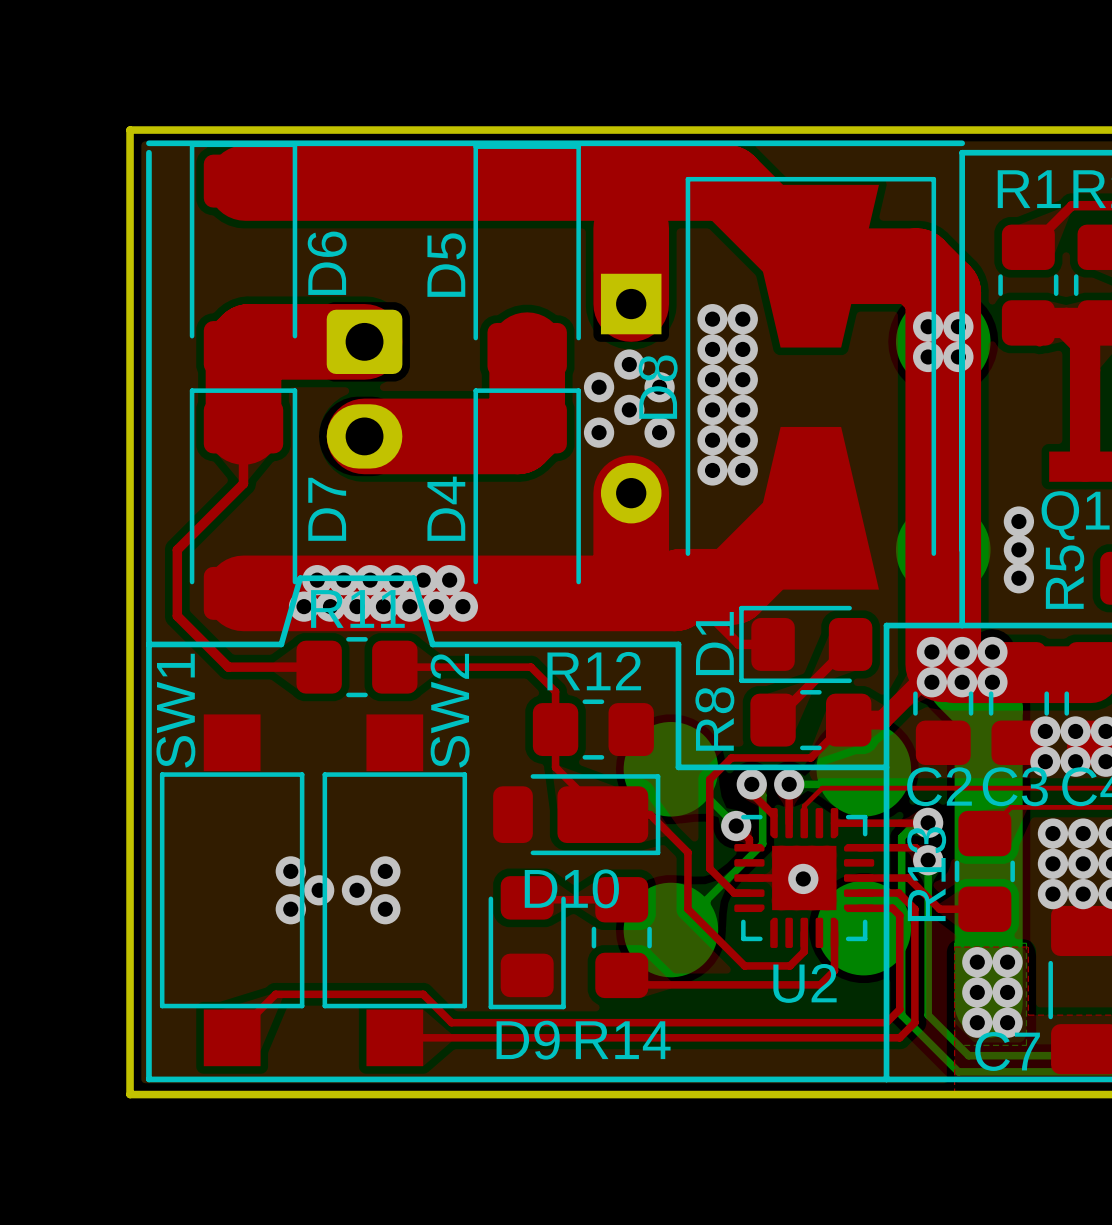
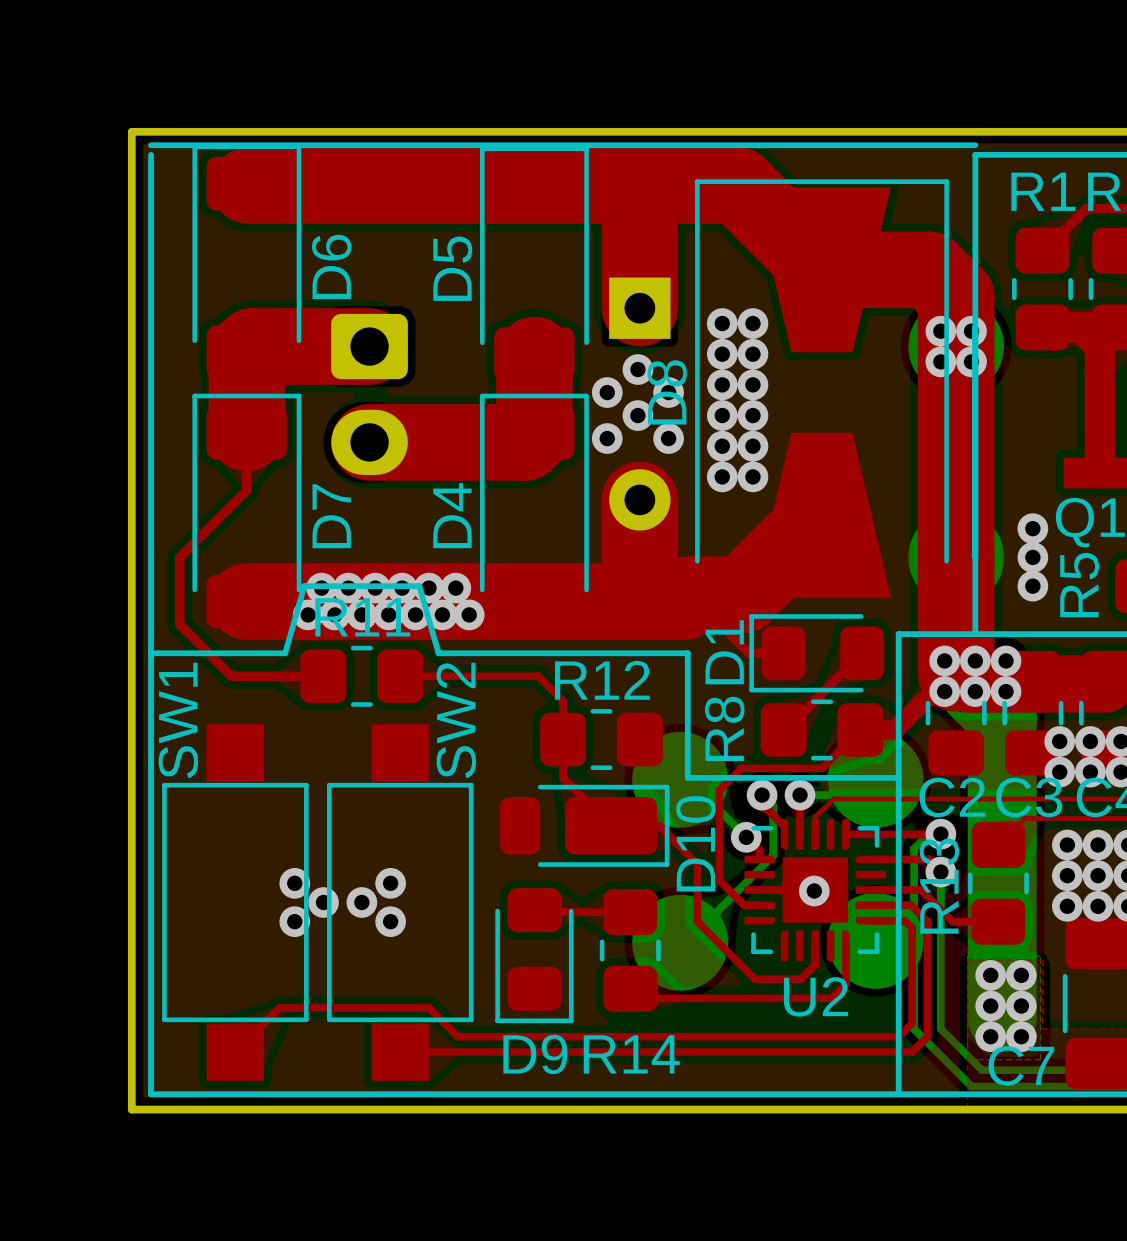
D10 name rotation: 0° (571, 888) -> 90° counterclockwise (695, 843)

